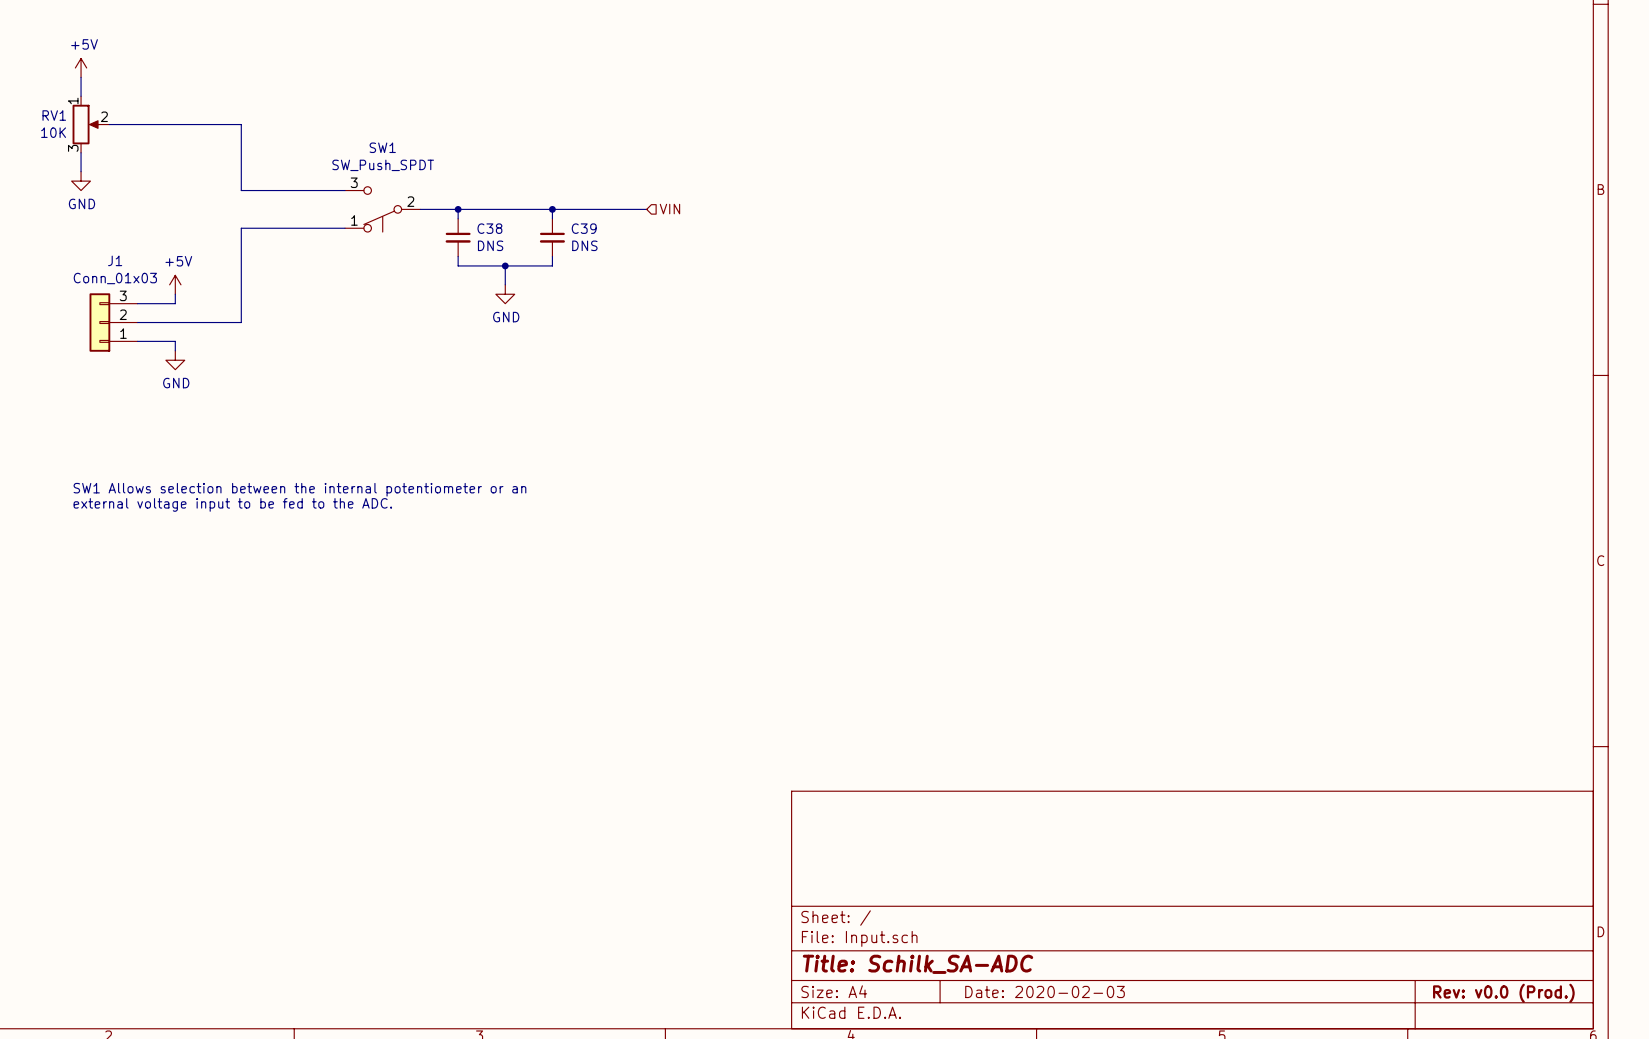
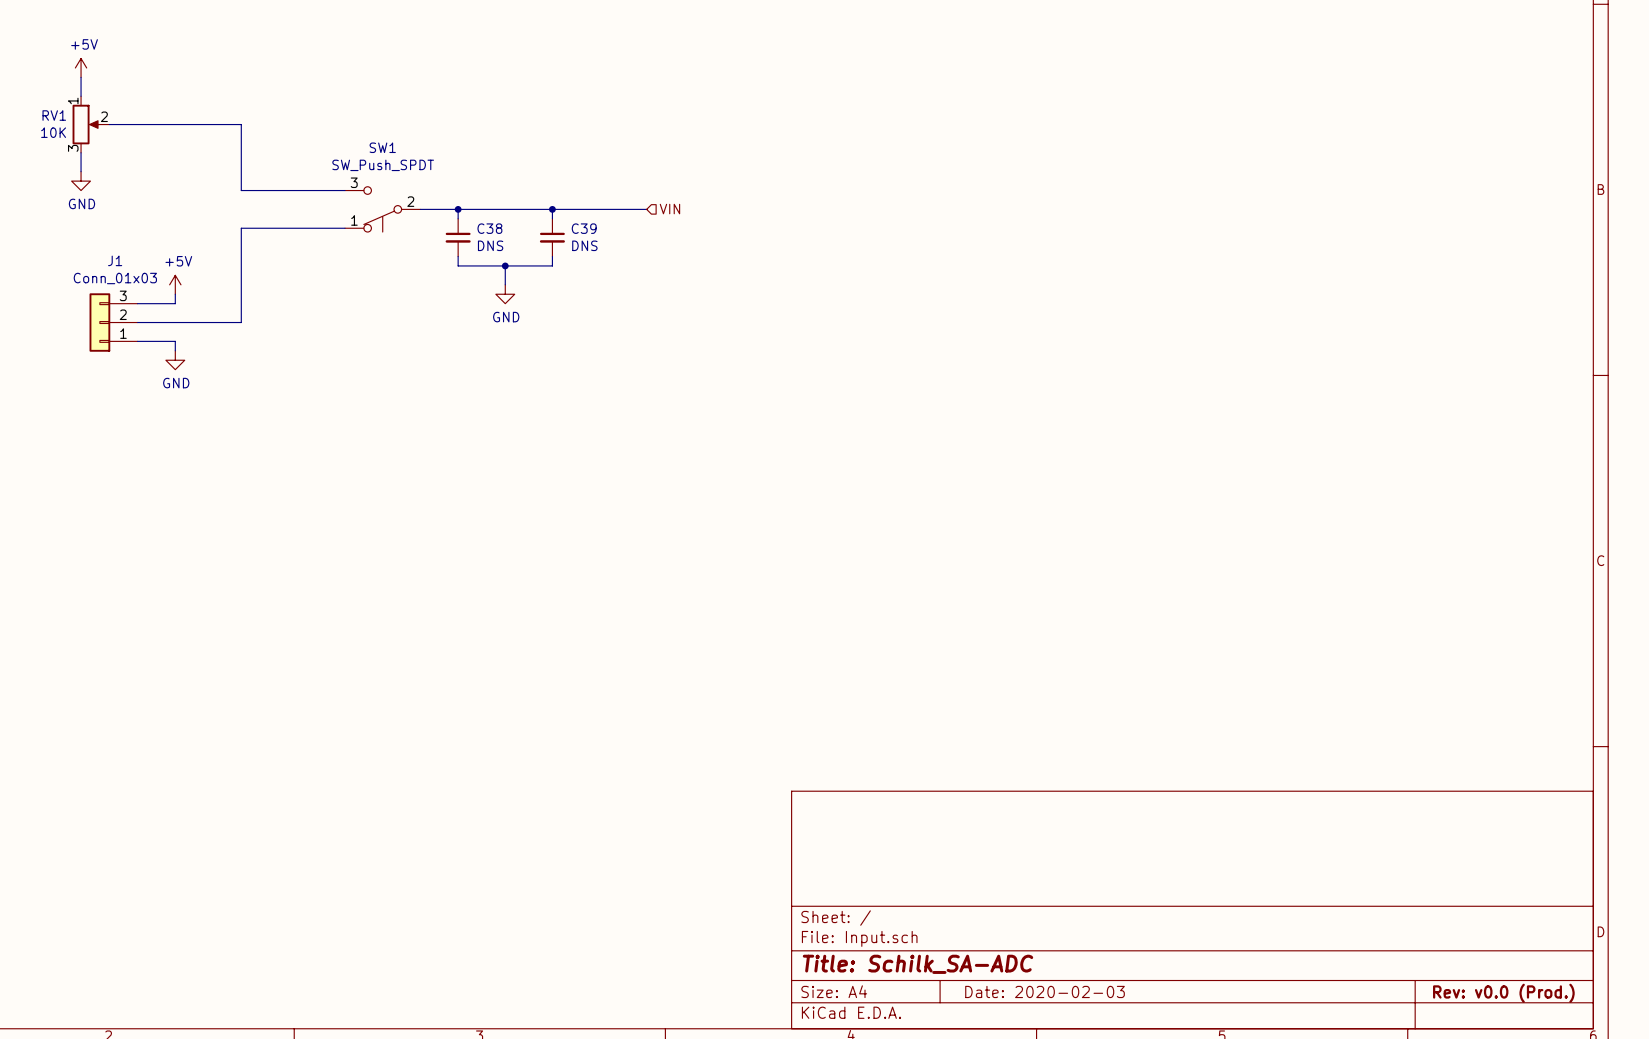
text: SW1 Allows selection between the internal potentiometer or an (299, 489) -> none
text: external voltage input to be fed to the ADC. (232, 504) -> none

